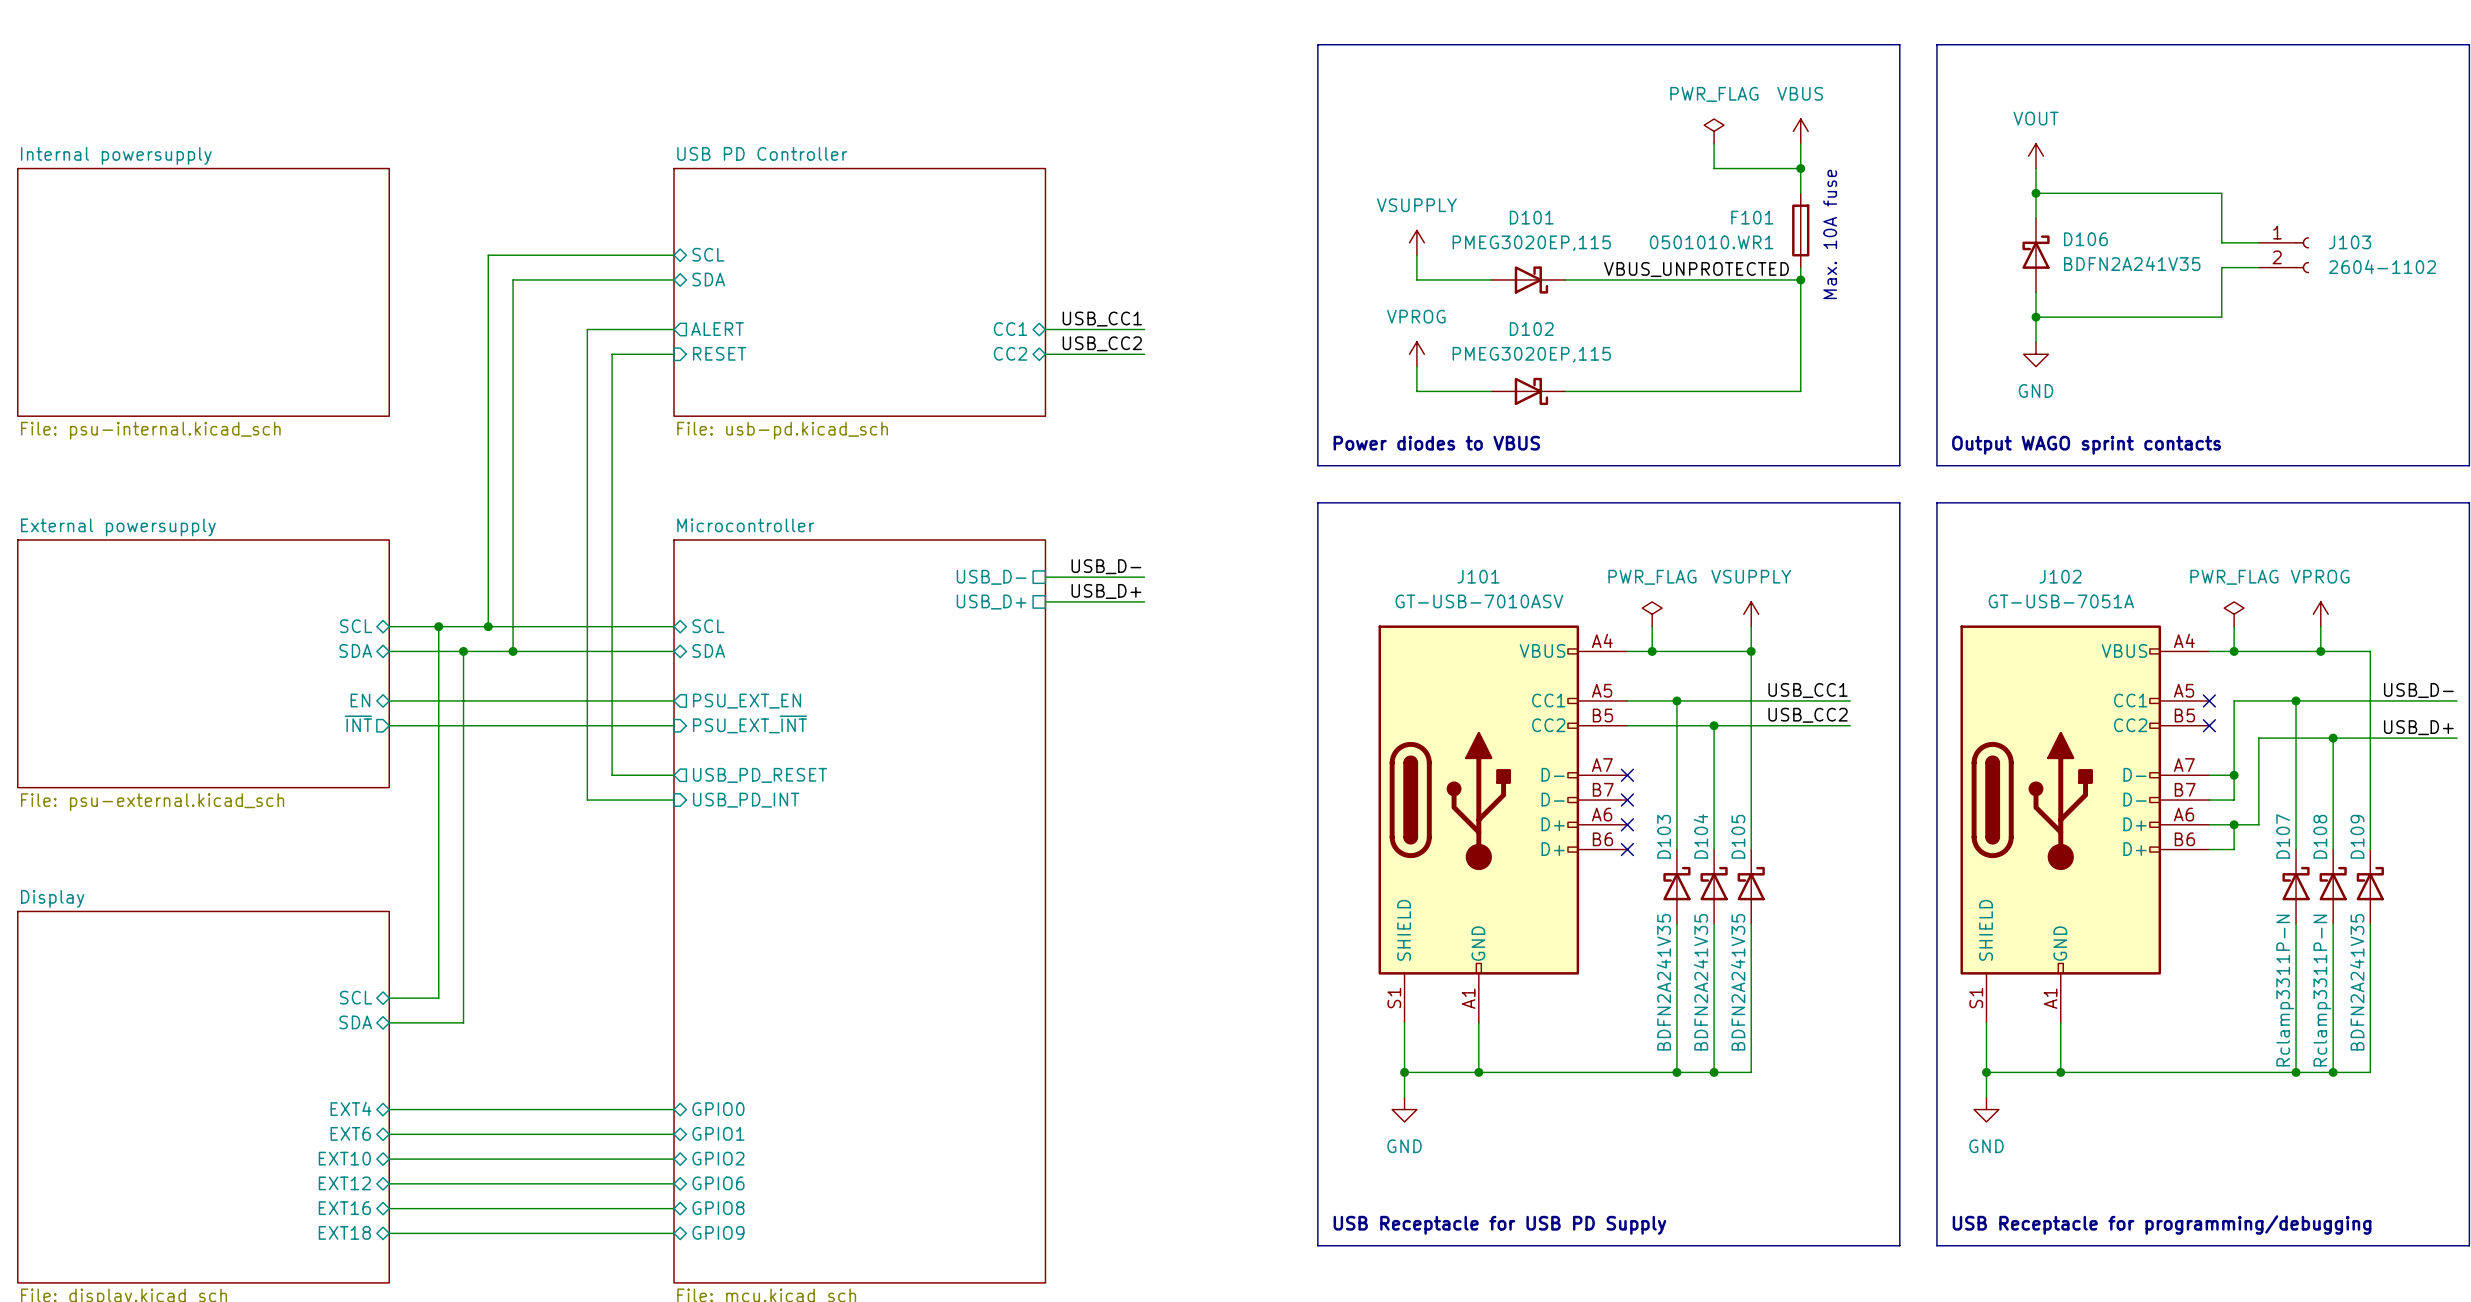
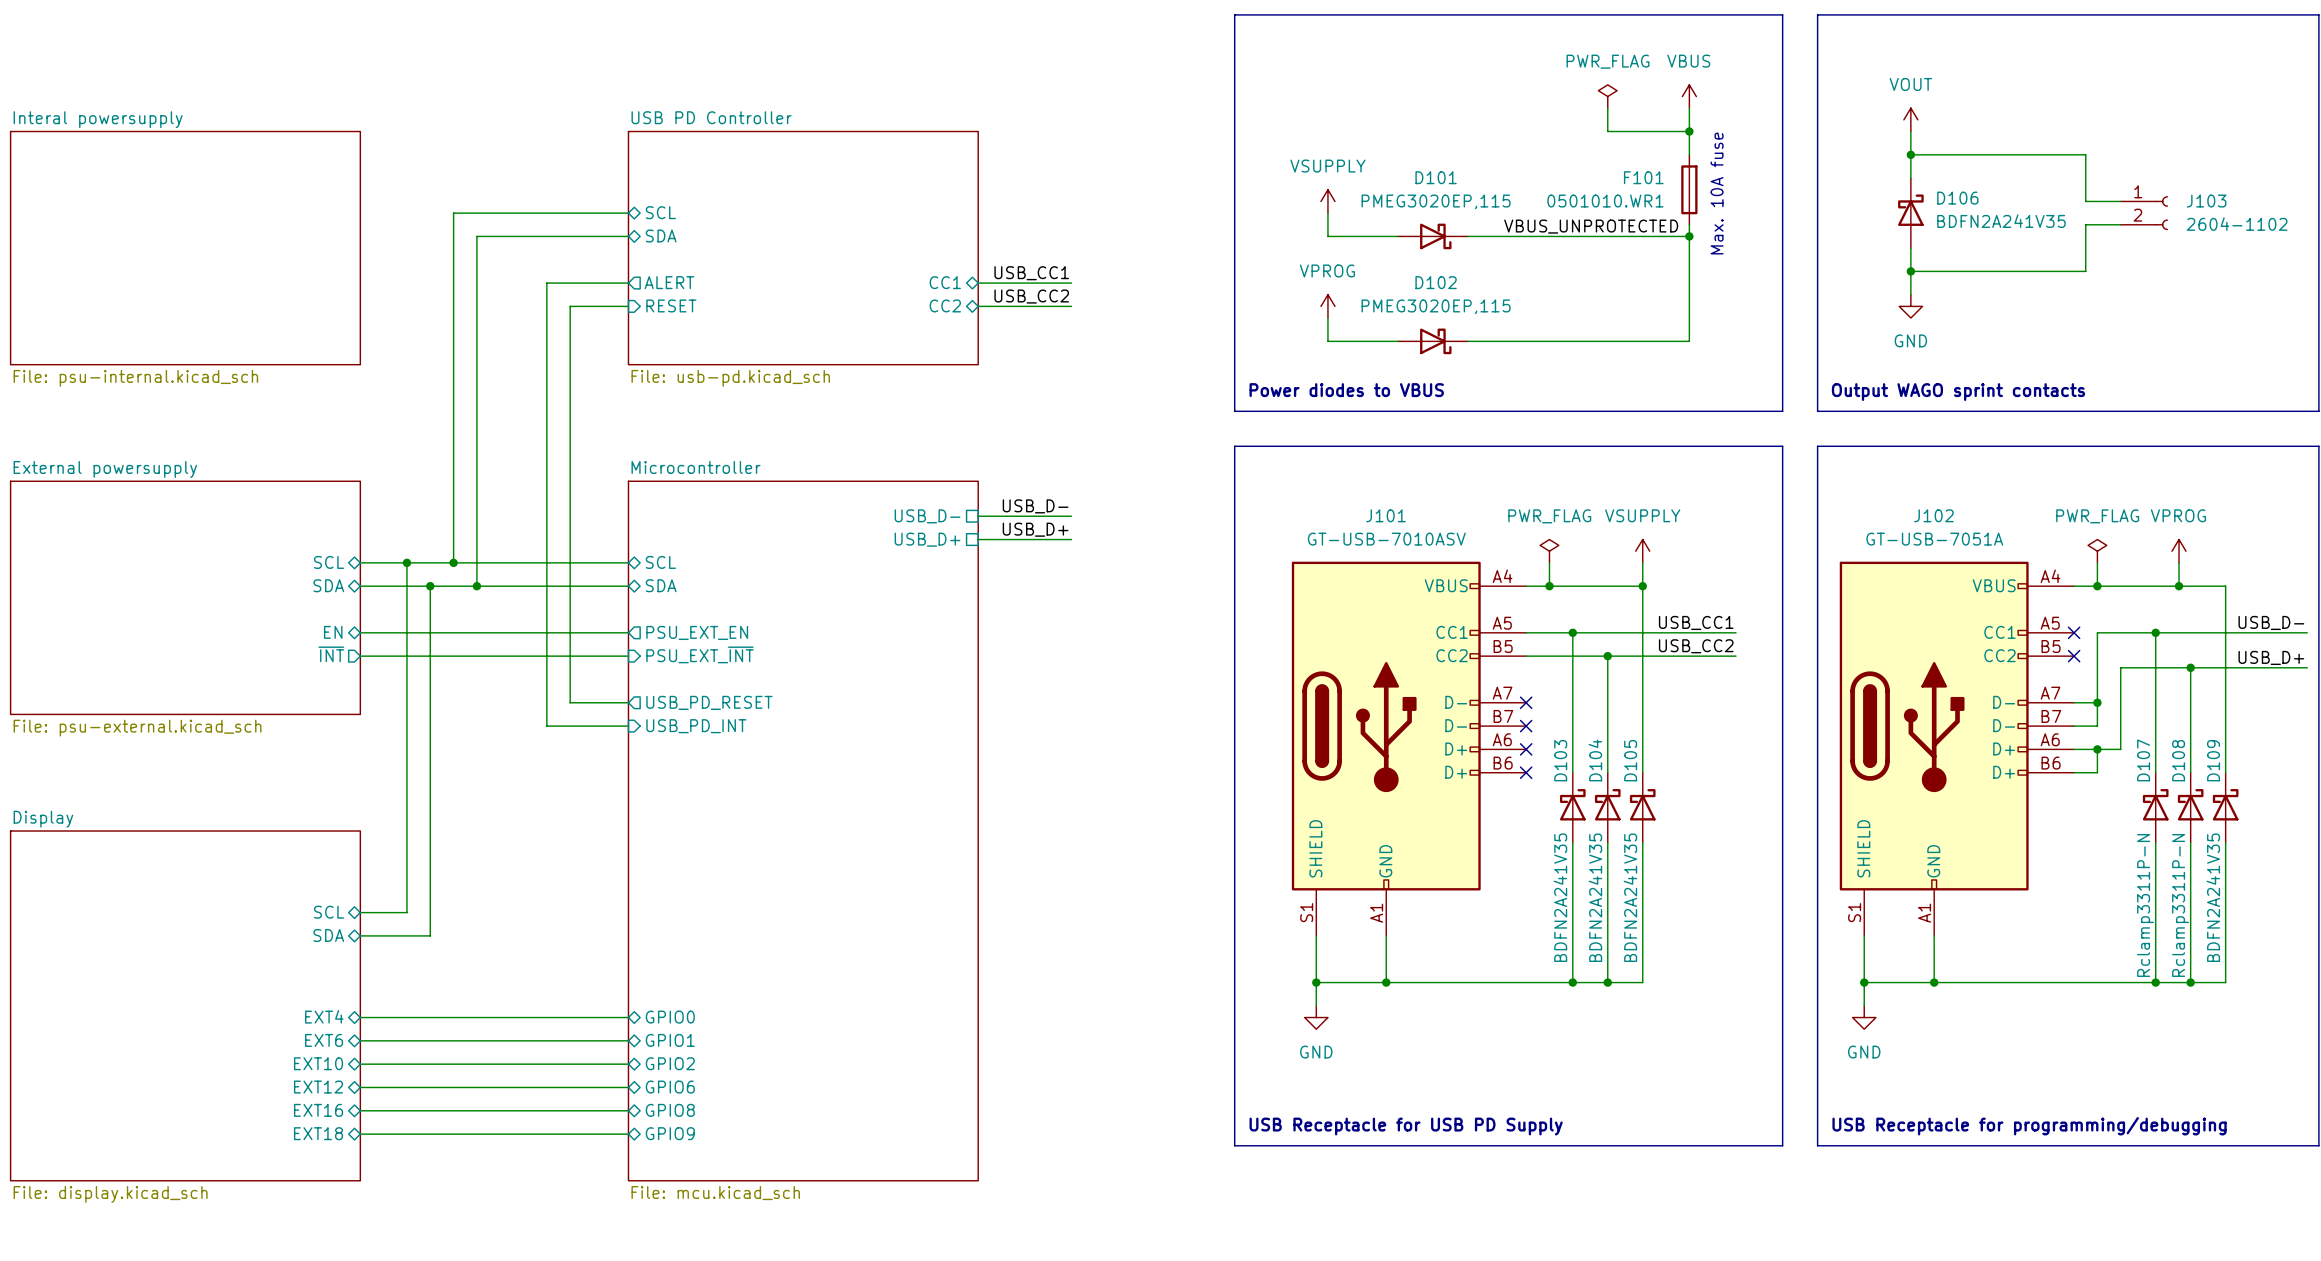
sheet Internal powersupply name: Internal powersupply (116, 155) -> Interal powersupply (98, 119)

